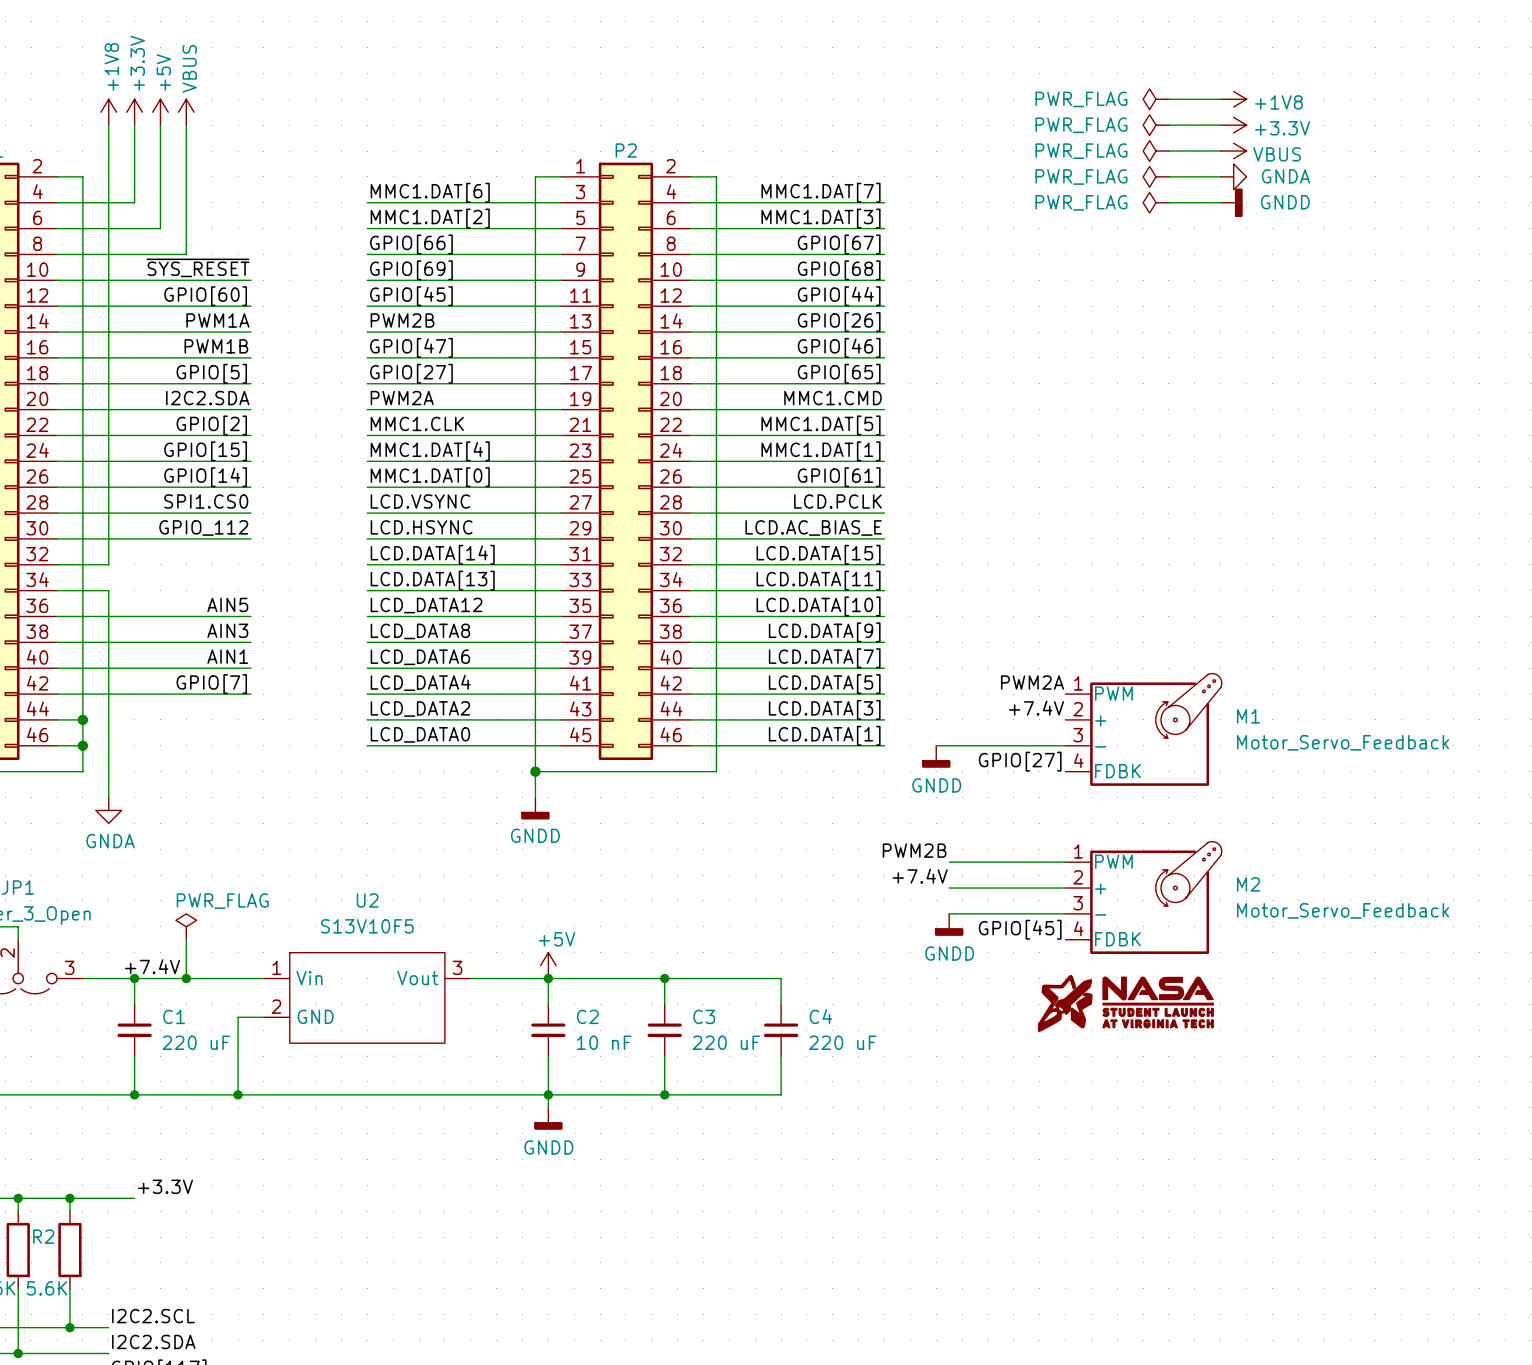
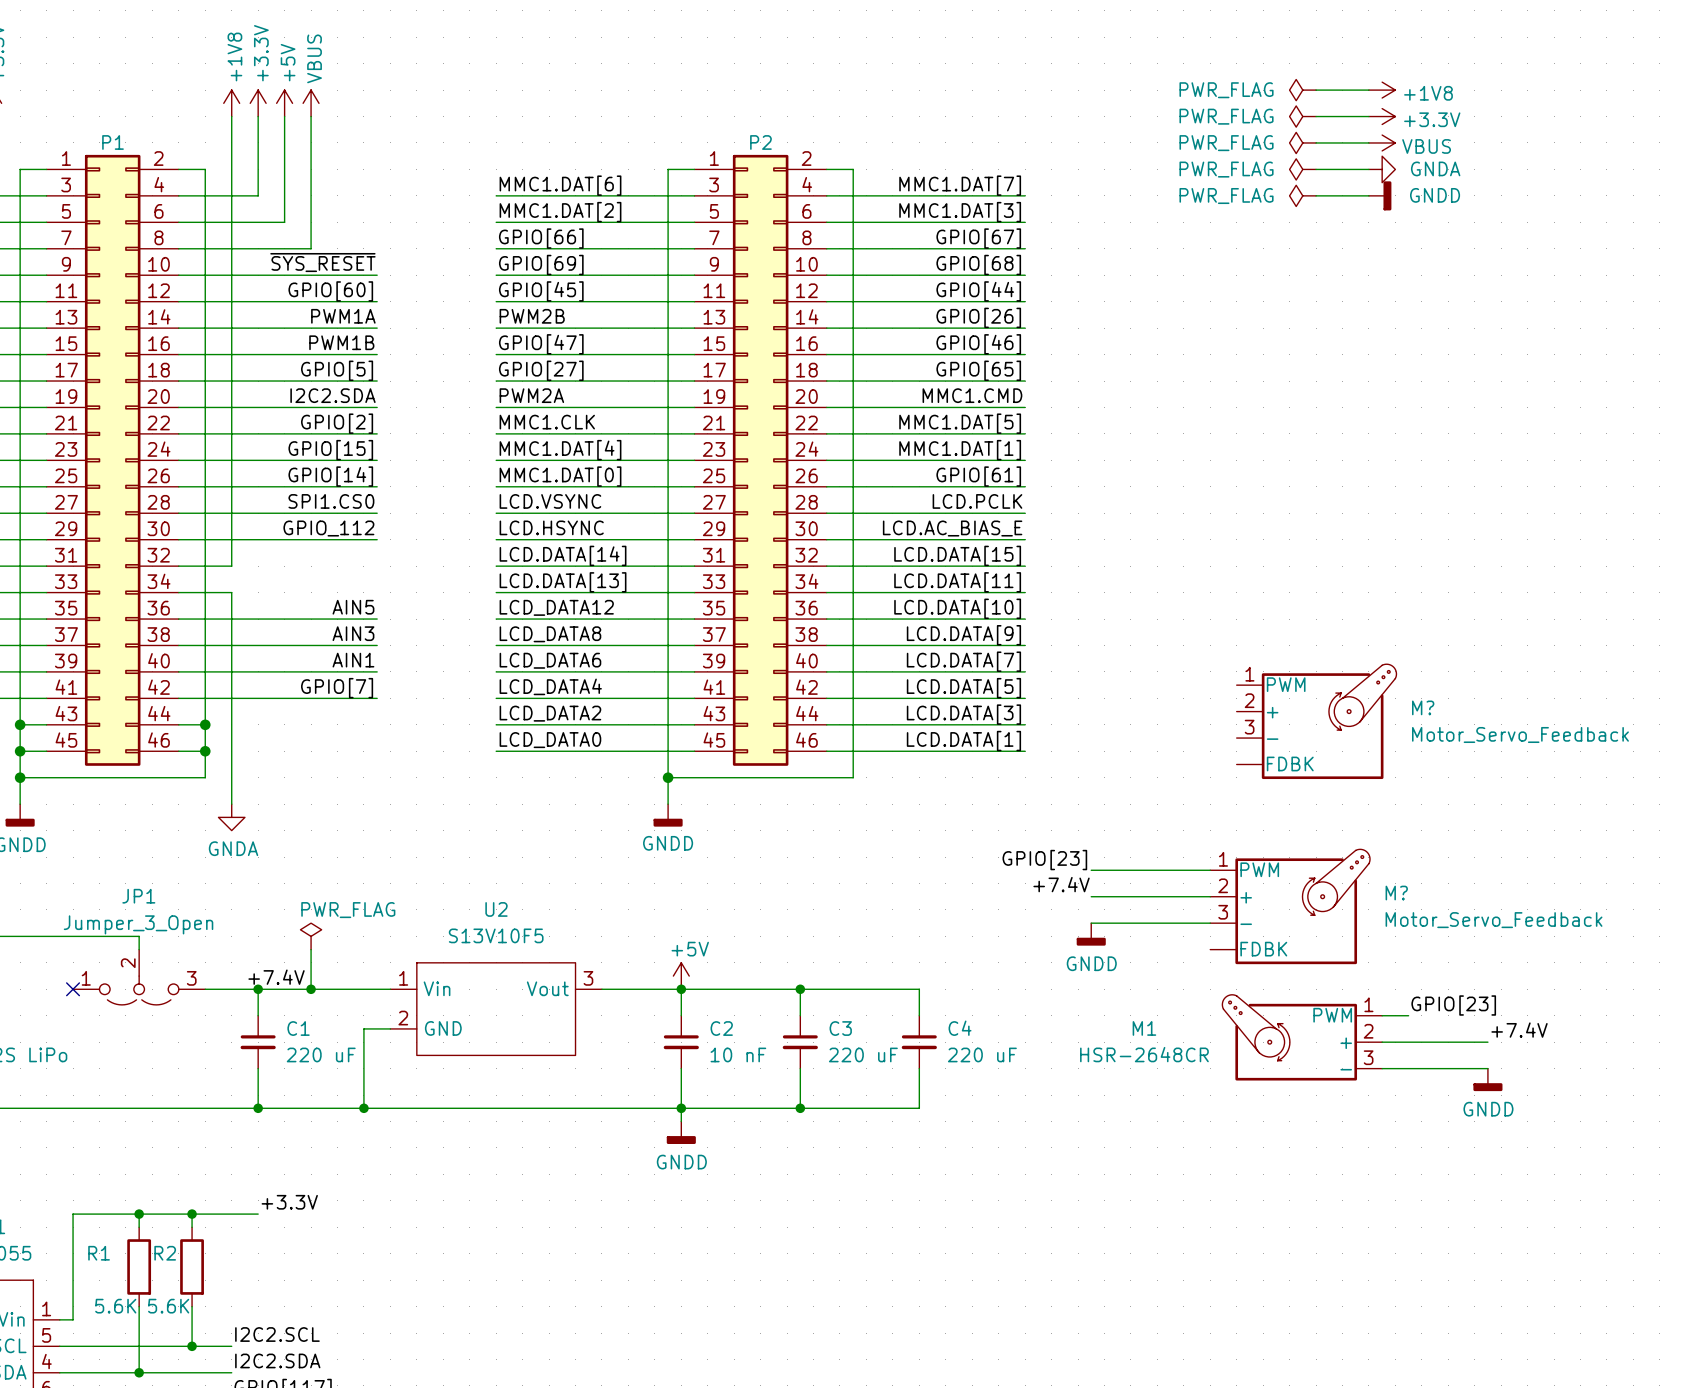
M1 symbol: [1065, 673, 1222, 786] -> [1222, 994, 1383, 1081]
label: PWM2A (1032, 682) -> none
label: +7.4V (1036, 708) -> none
M?: none -> Motor_Servo_Feedback (1316, 721)
M1 name position: M1 (1248, 716) -> M1 (1144, 1028)
M1 value: Motor_Servo_Feedback (1343, 742) -> HSR-2648CR (1144, 1054)
wire: (936, 745) (1065, 745) -> none
power symbol: GNDD (936, 756) -> none
label: GPIO[27] (1020, 761) -> none
label: PWM2B (914, 850) -> GPIO[23] (1044, 860)
M2 name: M2 (1248, 884) -> M? (1396, 893)
M2 pin number: 4 (1078, 928) -> none
label: GPIO[45] (1020, 929) -> none
label: none -> GPIO[23] (1453, 1005)
power symbol: (1125, 1003) -> none
wire: none -> (1382, 1015) (1408, 1015)
label: none -> +7.4V (1519, 1030)
wire: none -> (1382, 1042) (1487, 1042)
wire: none -> (1382, 1068) (1487, 1068)
power symbol: none -> GNDD (1487, 1079)

